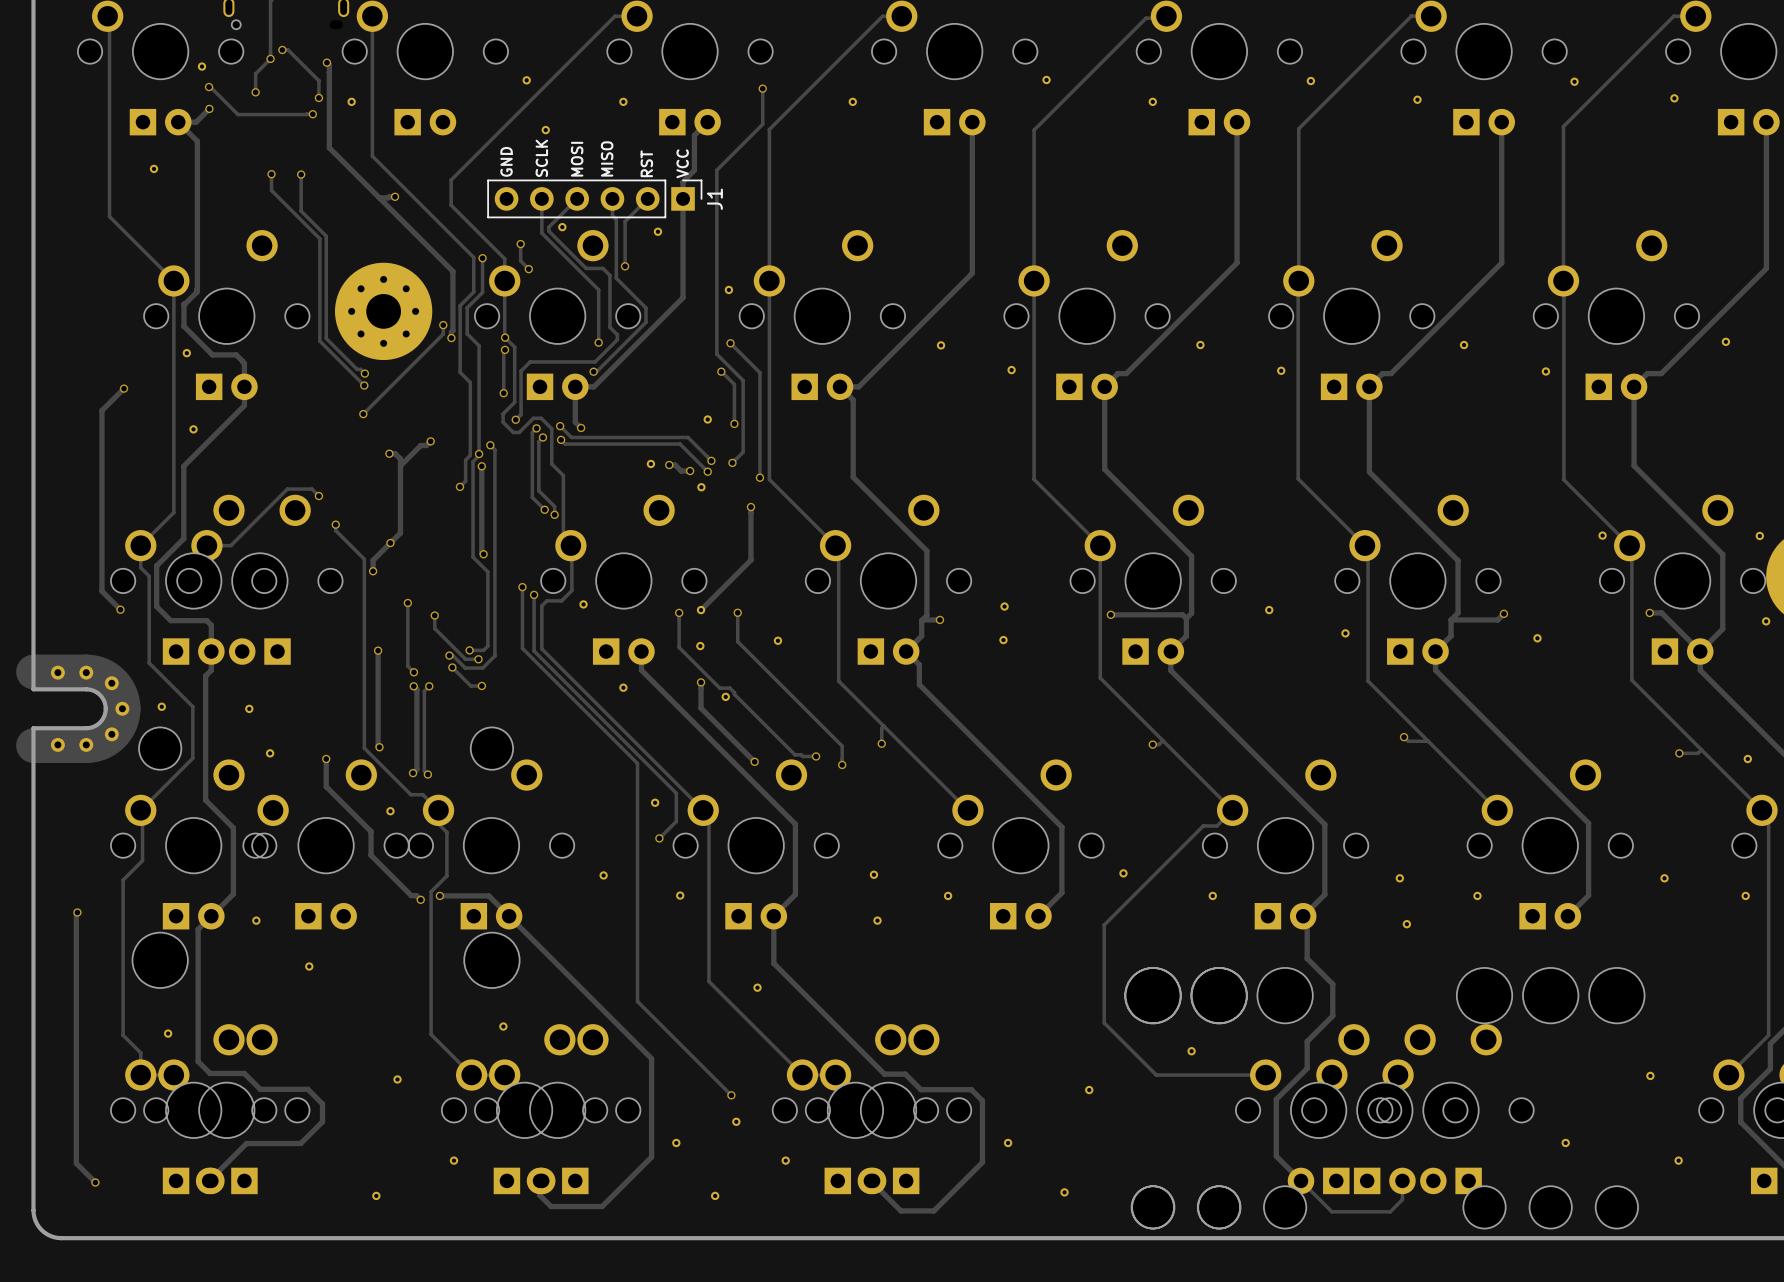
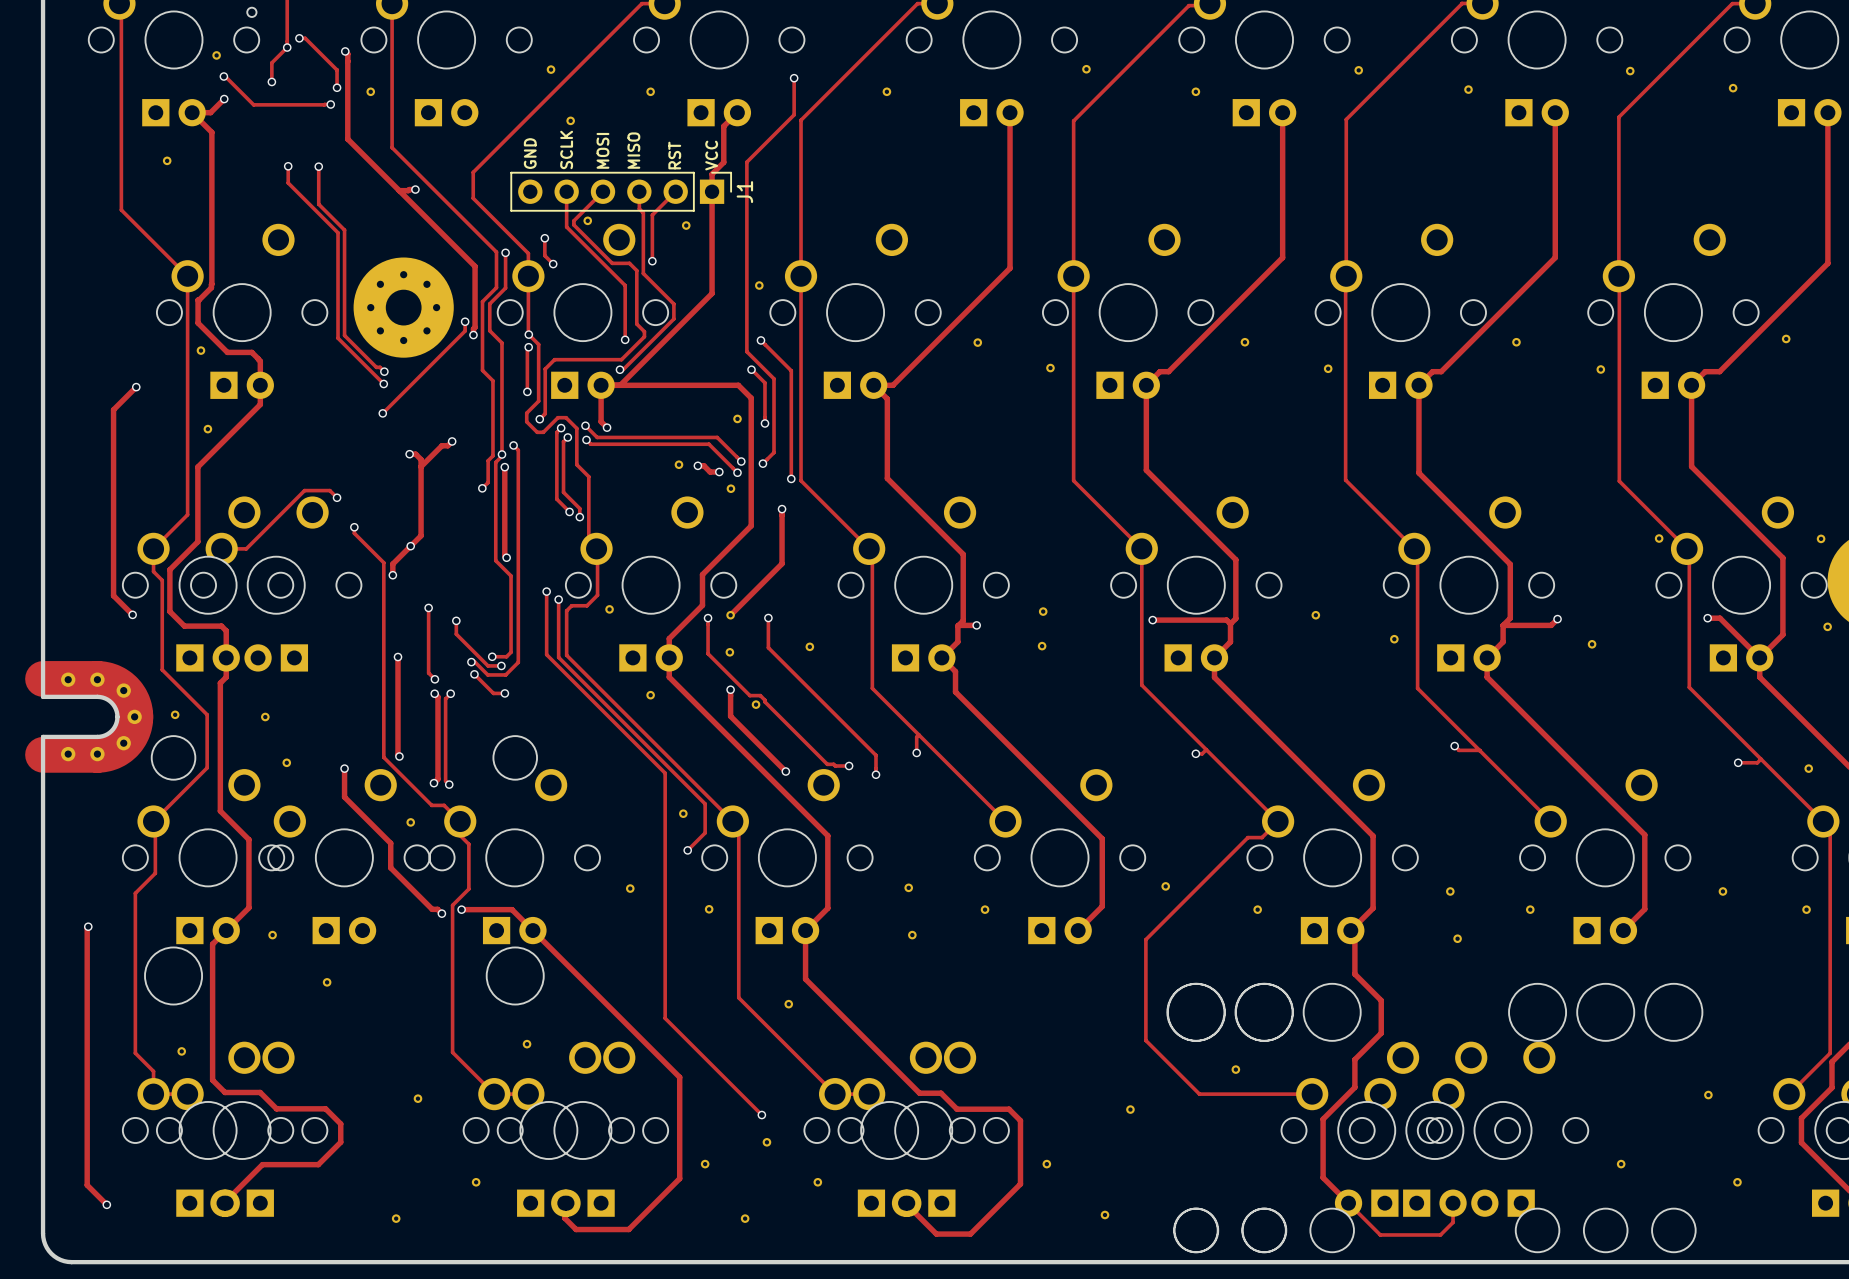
track: none -> (620, 385) (738, 385) (751, 398) (751, 525) (702, 574) (702, 605) (669, 638) (669, 657)

